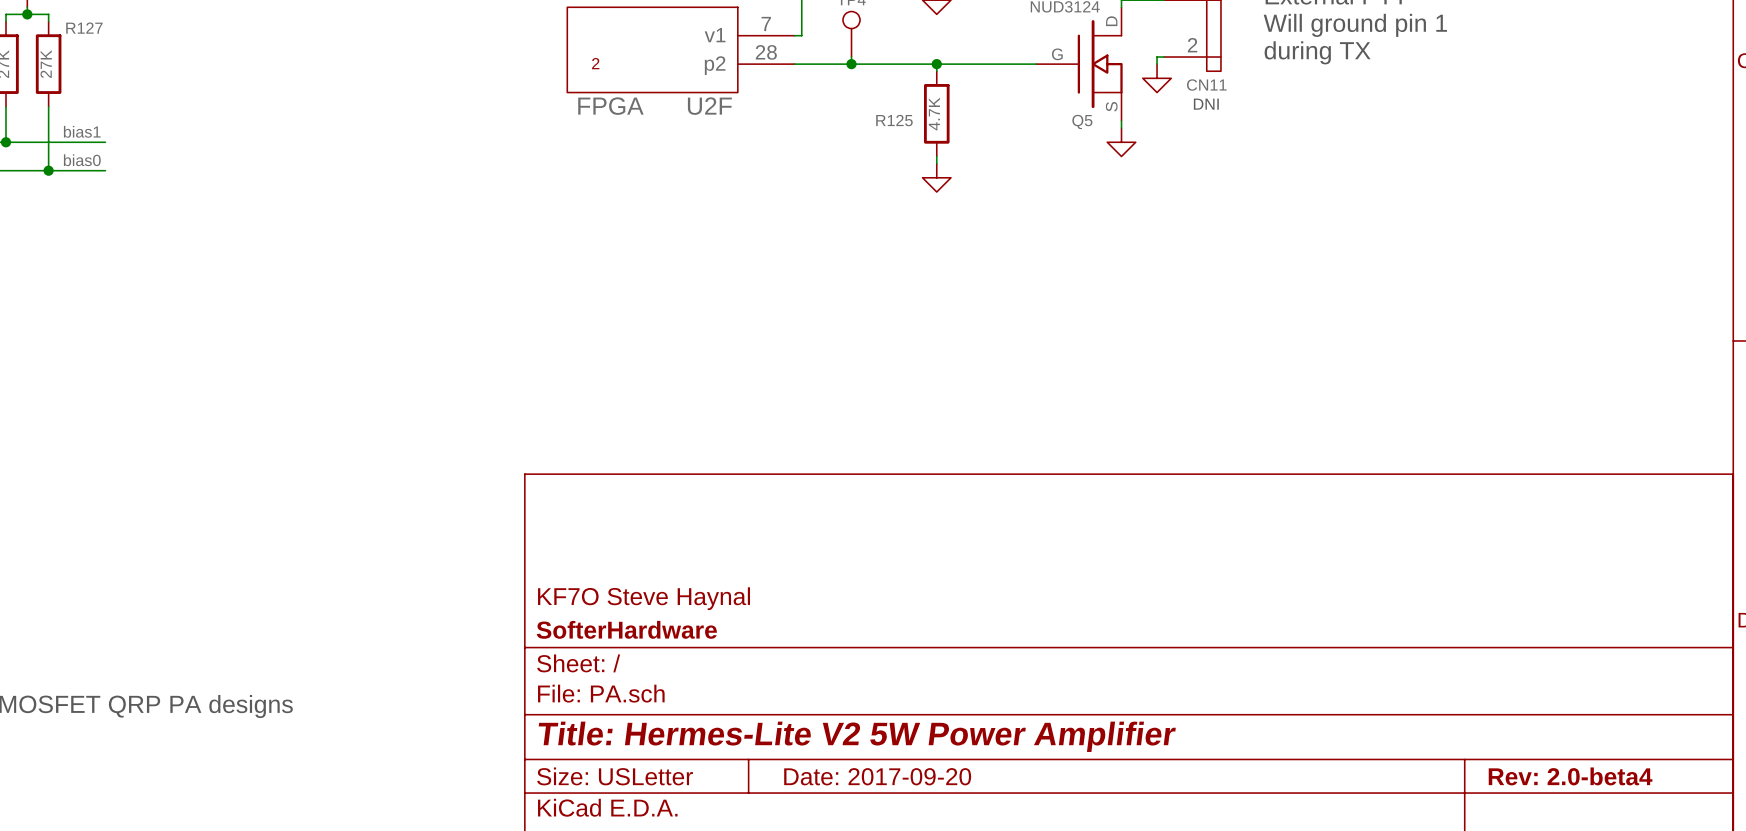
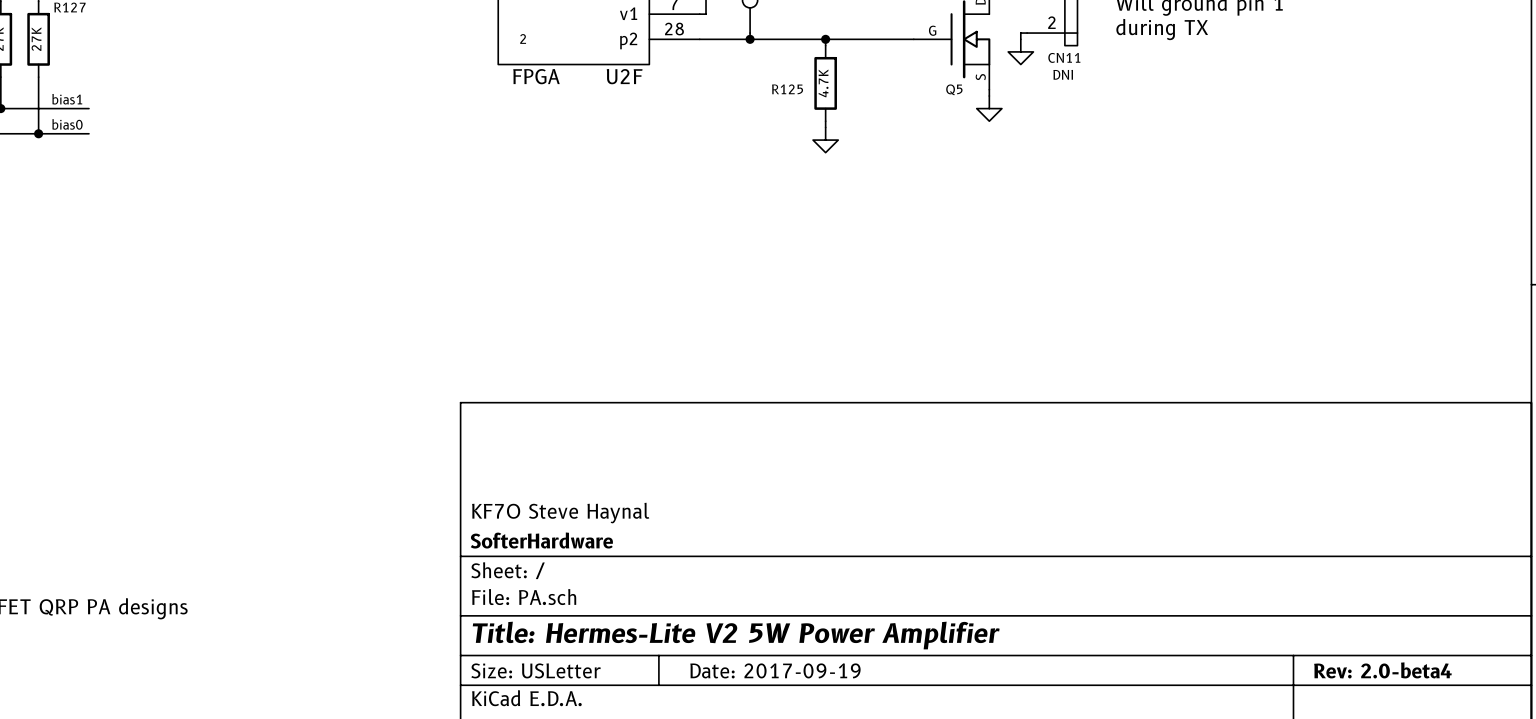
title block: Date: 2017-09-20 (877, 776) -> Date: 2017-09-19 (775, 670)

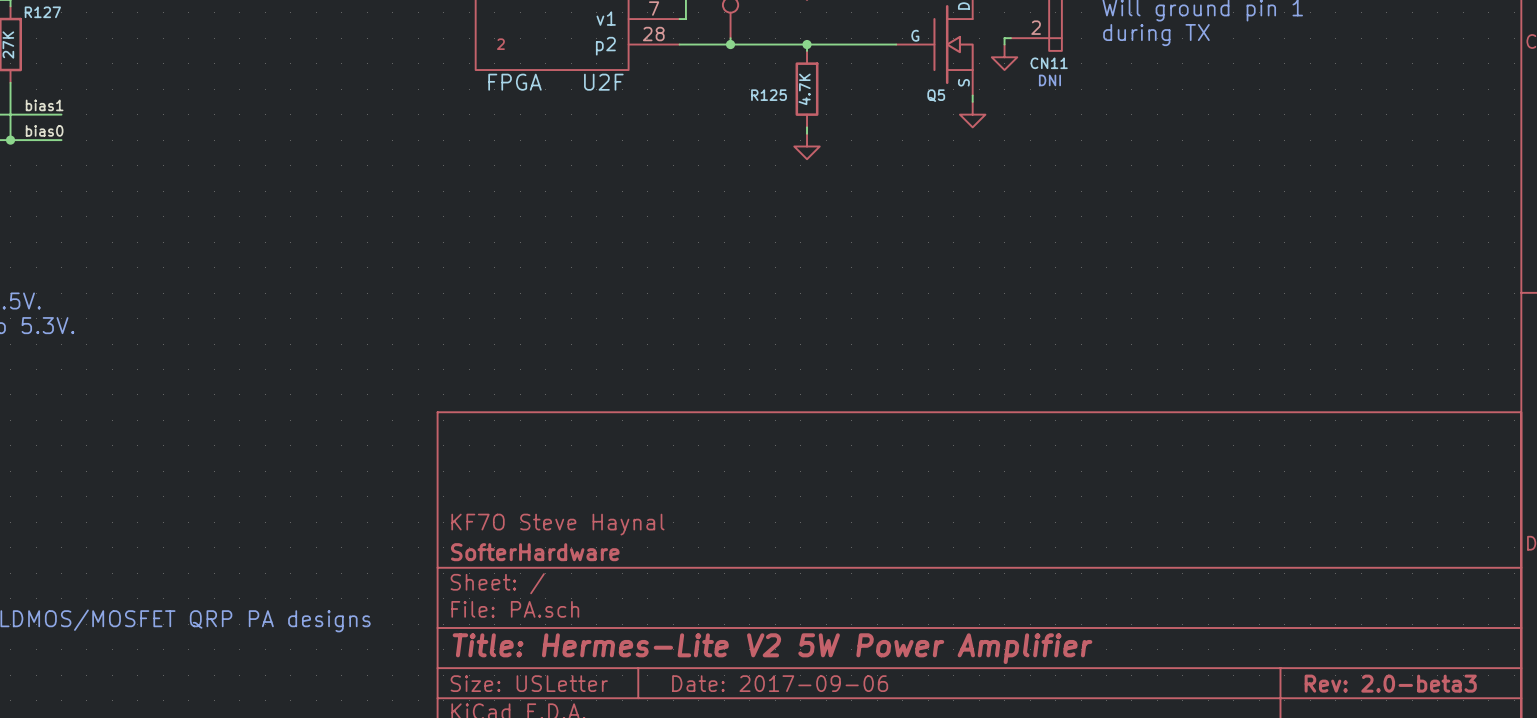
title block: Date: 2017-09-19 (775, 670) -> Date: 2017-09-06 (780, 683)
title block: Rev: 2.0-beta4 (1382, 670) -> Rev: 2.0-beta3 (1390, 683)

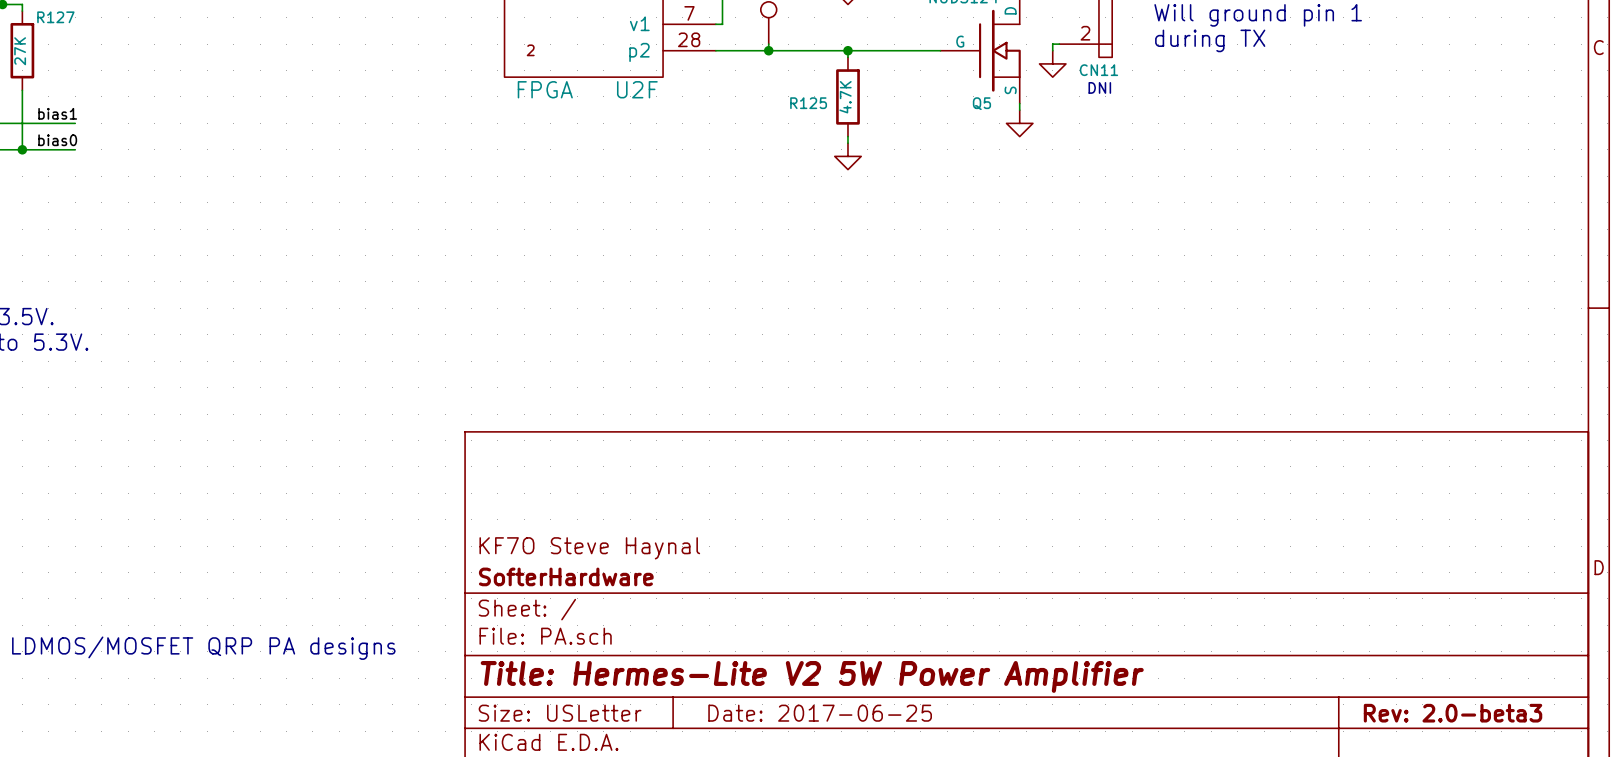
title block: Date: 2017-09-06 (780, 683) -> Date: 2017-06-25 (820, 713)

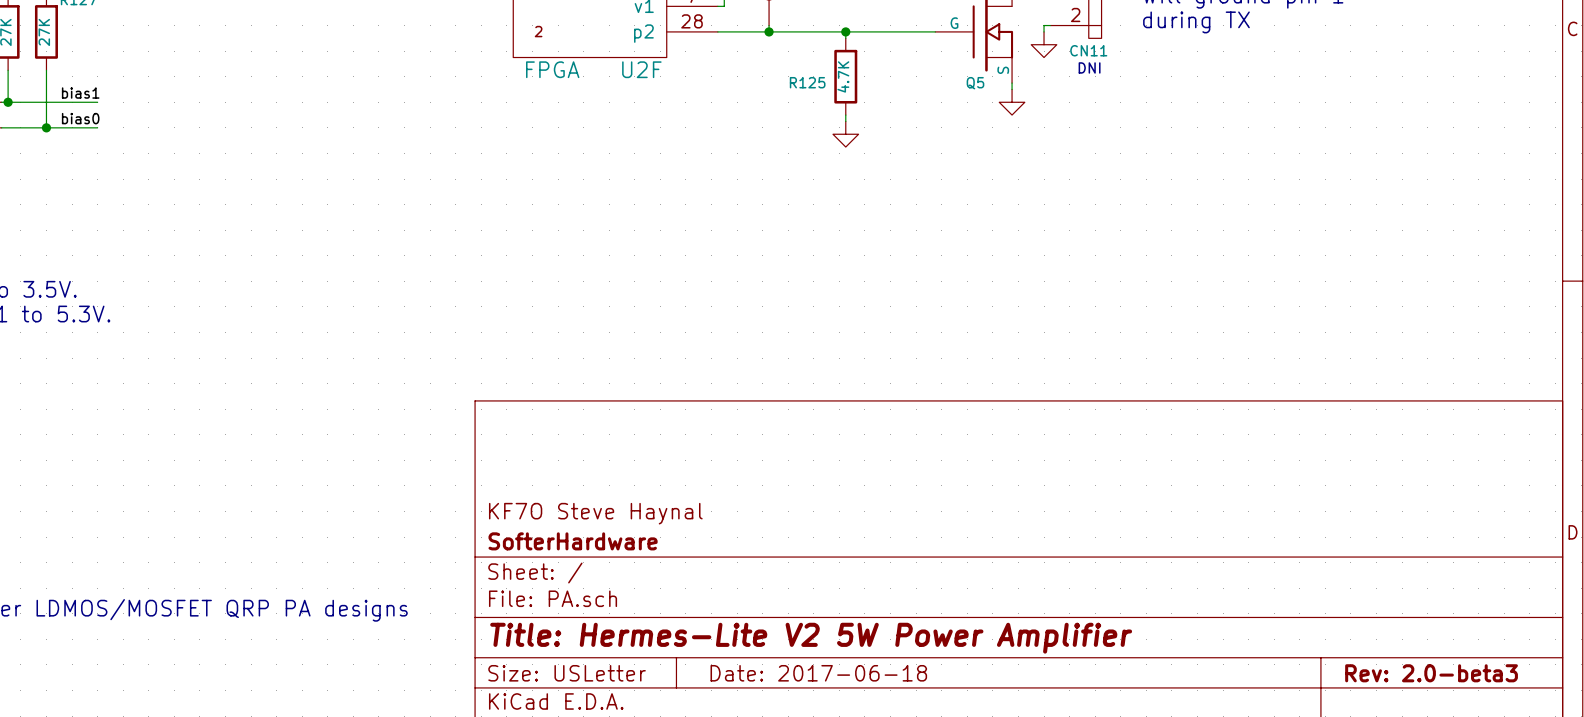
title block: Date: 2017-06-25 (820, 713) -> Date: 2017-06-18 (818, 673)

